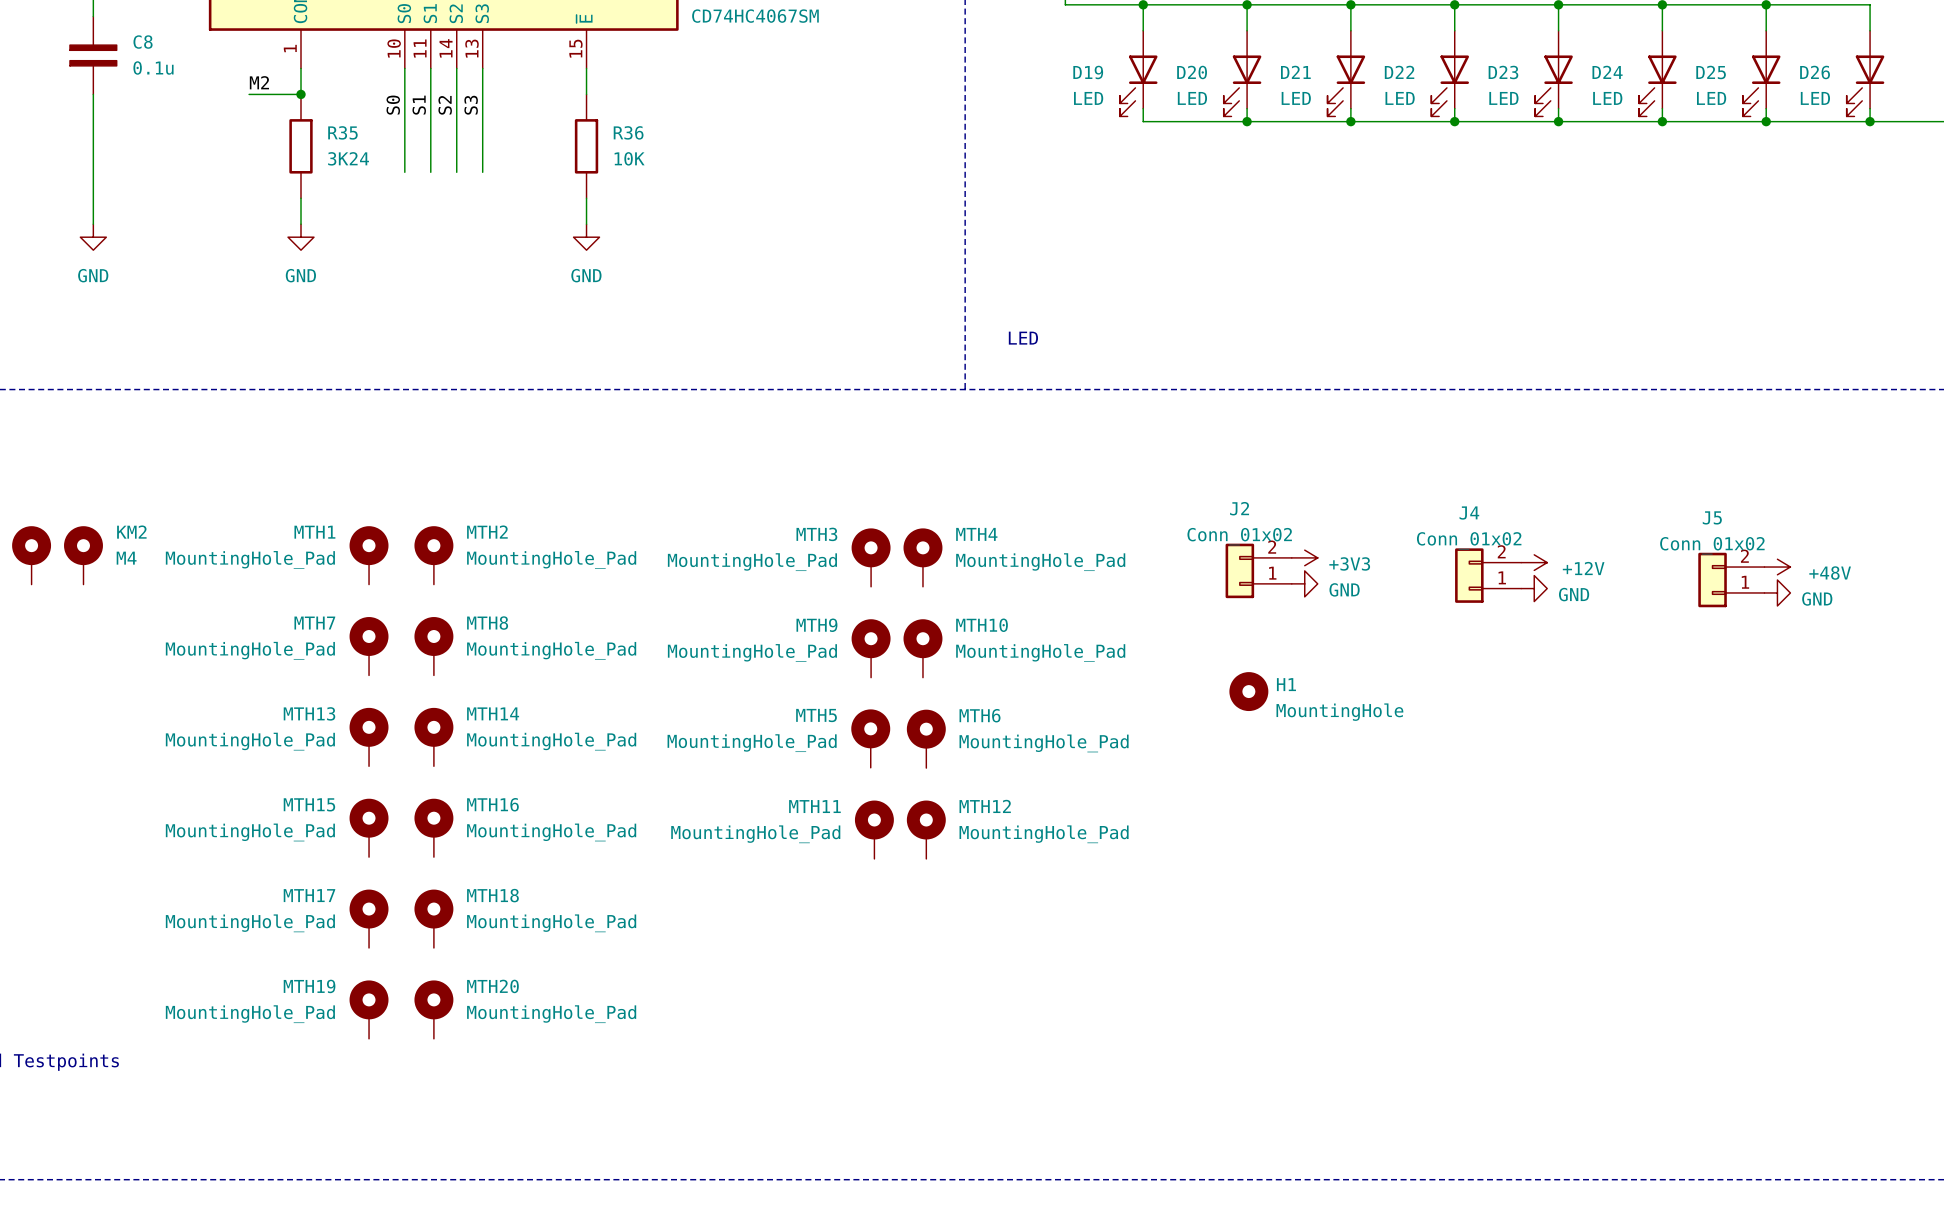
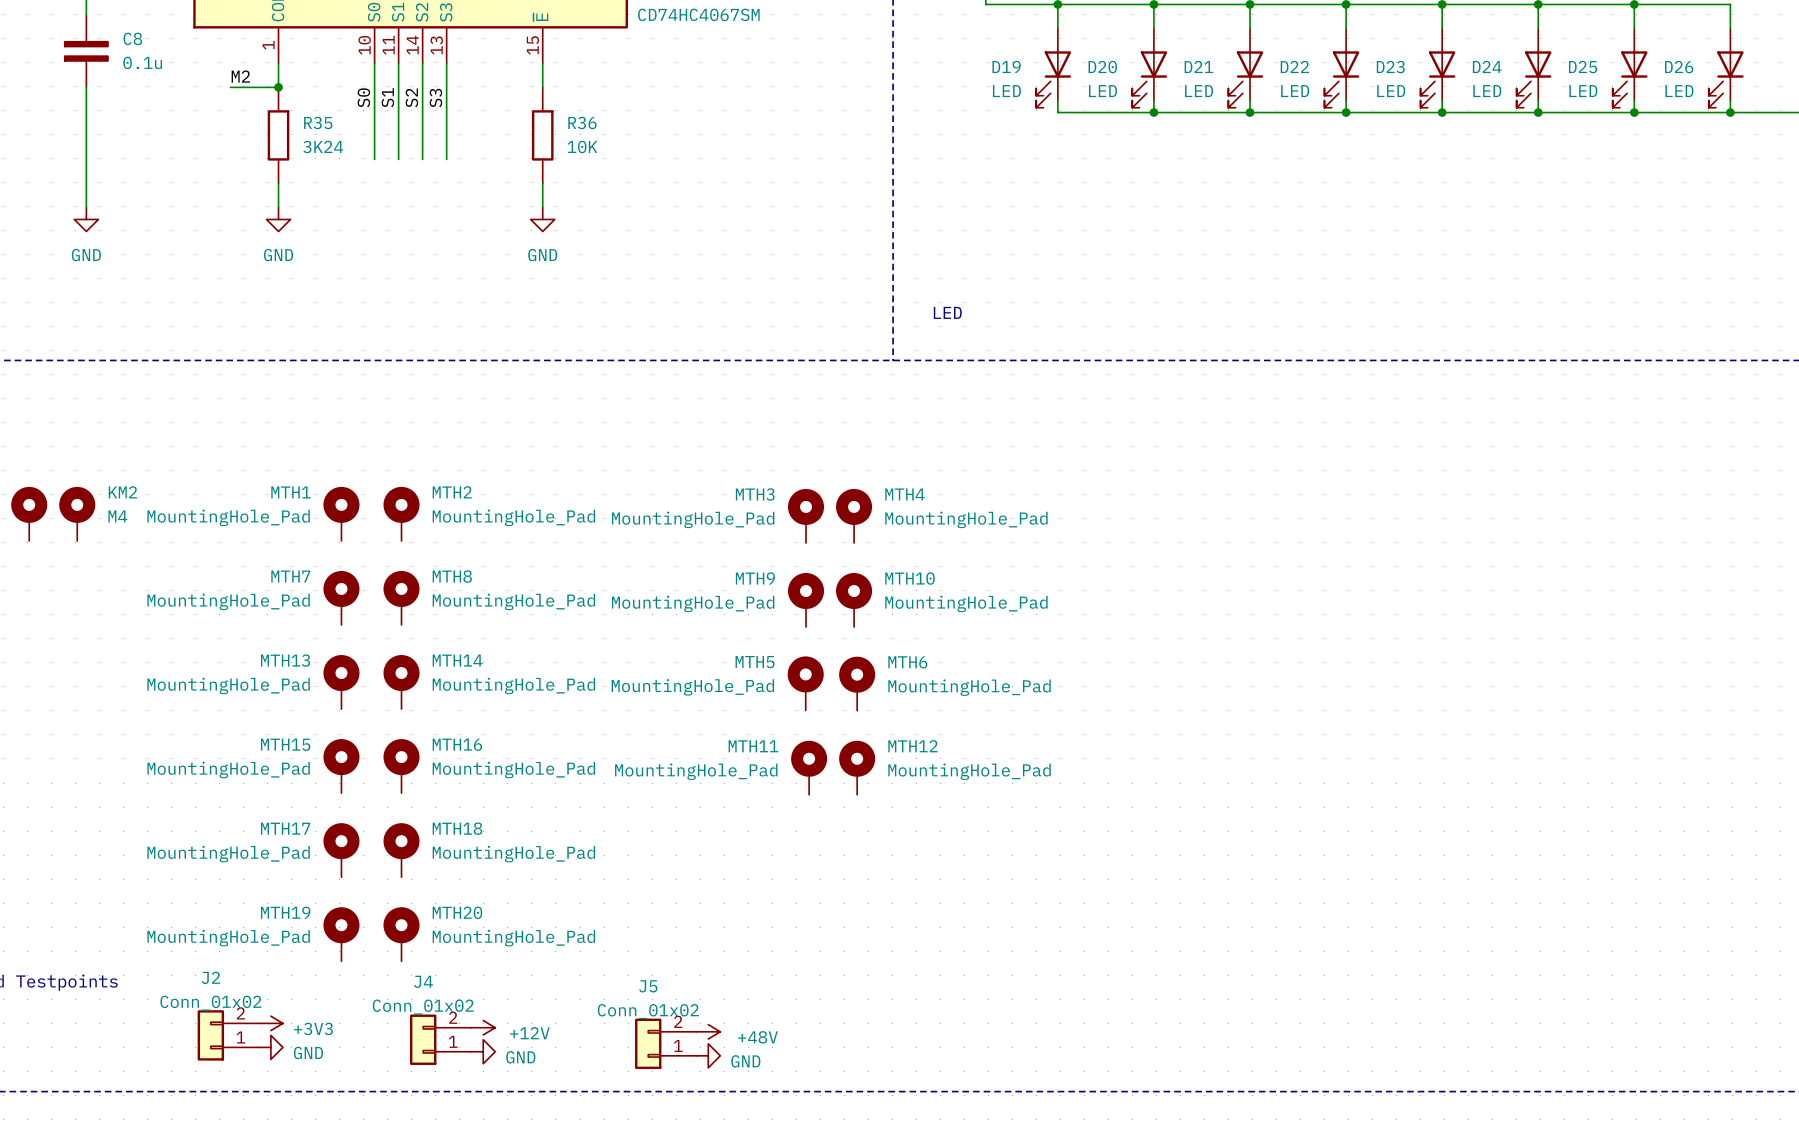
power symbol: +3V3 (1304, 557) -> none
power symbol: +12V (1534, 562) -> none
power symbol: +48V (1777, 567) -> none
J2 position: (1258, 570) -> (228, 1035)
J4 position: (1488, 575) -> (440, 1039)
J5 position: (1731, 580) -> (665, 1043)
power symbol: GND (1304, 583) -> none
power symbol: GND (1534, 588) -> none
power symbol: GND (1777, 592) -> none
H1: MountingHole (1248, 691) -> none
power symbol: none -> +3V3 (270, 1023)
power symbol: none -> +12V (483, 1027)
power symbol: none -> +48V (708, 1031)
power symbol: none -> GND (270, 1047)
power symbol: none -> GND (483, 1051)
power symbol: none -> GND (708, 1055)

